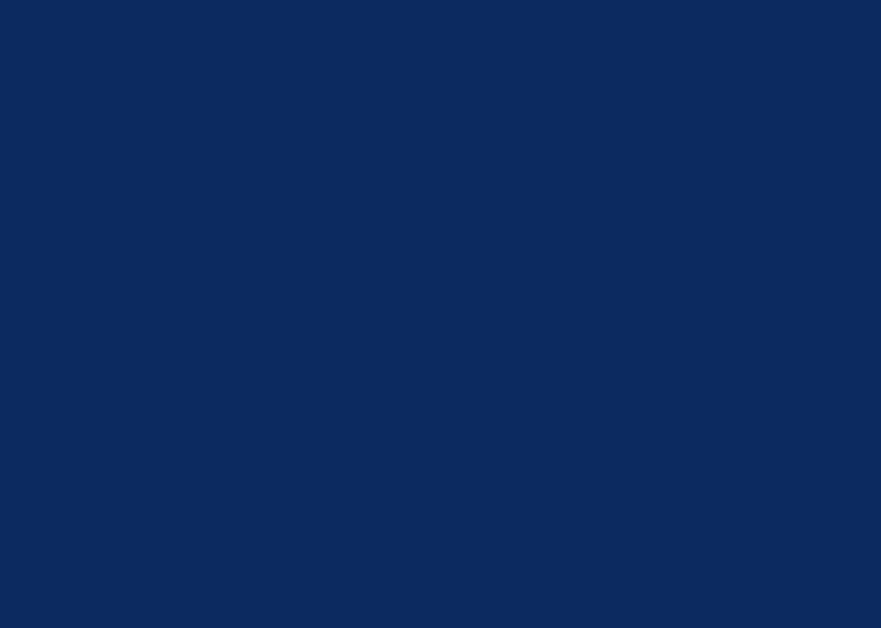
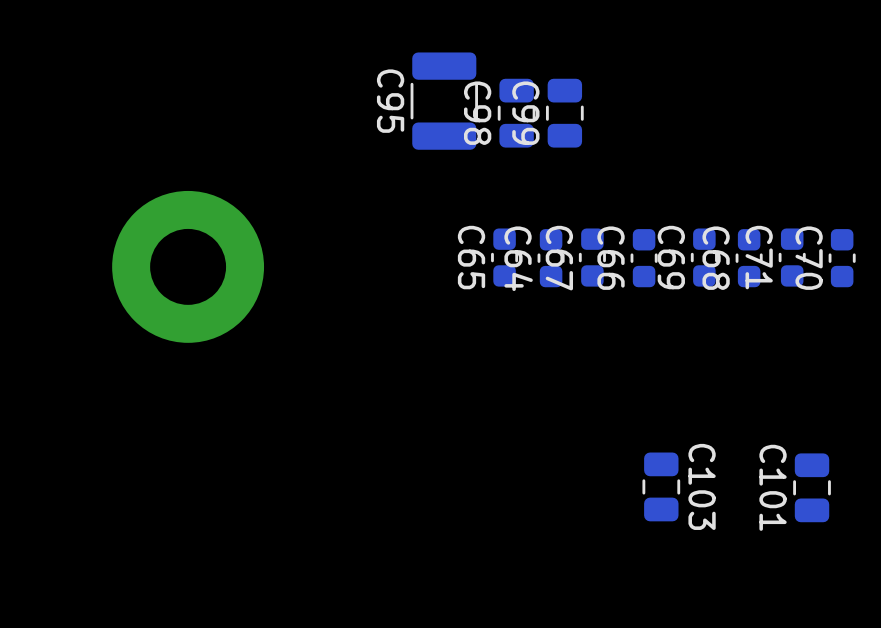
C95: none -> (444, 101)
C98: none -> (516, 113)
C99: none -> (564, 113)
C65: none -> (504, 257)
C67: none -> (592, 257)
C69: none -> (704, 257)
C71: none -> (792, 257)
C64: none -> (551, 258)
C66: none -> (644, 258)
C68: none -> (749, 258)
C70: none -> (842, 258)
part: none -> (188, 266)
C103: none -> (661, 486)
C101: none -> (812, 487)

